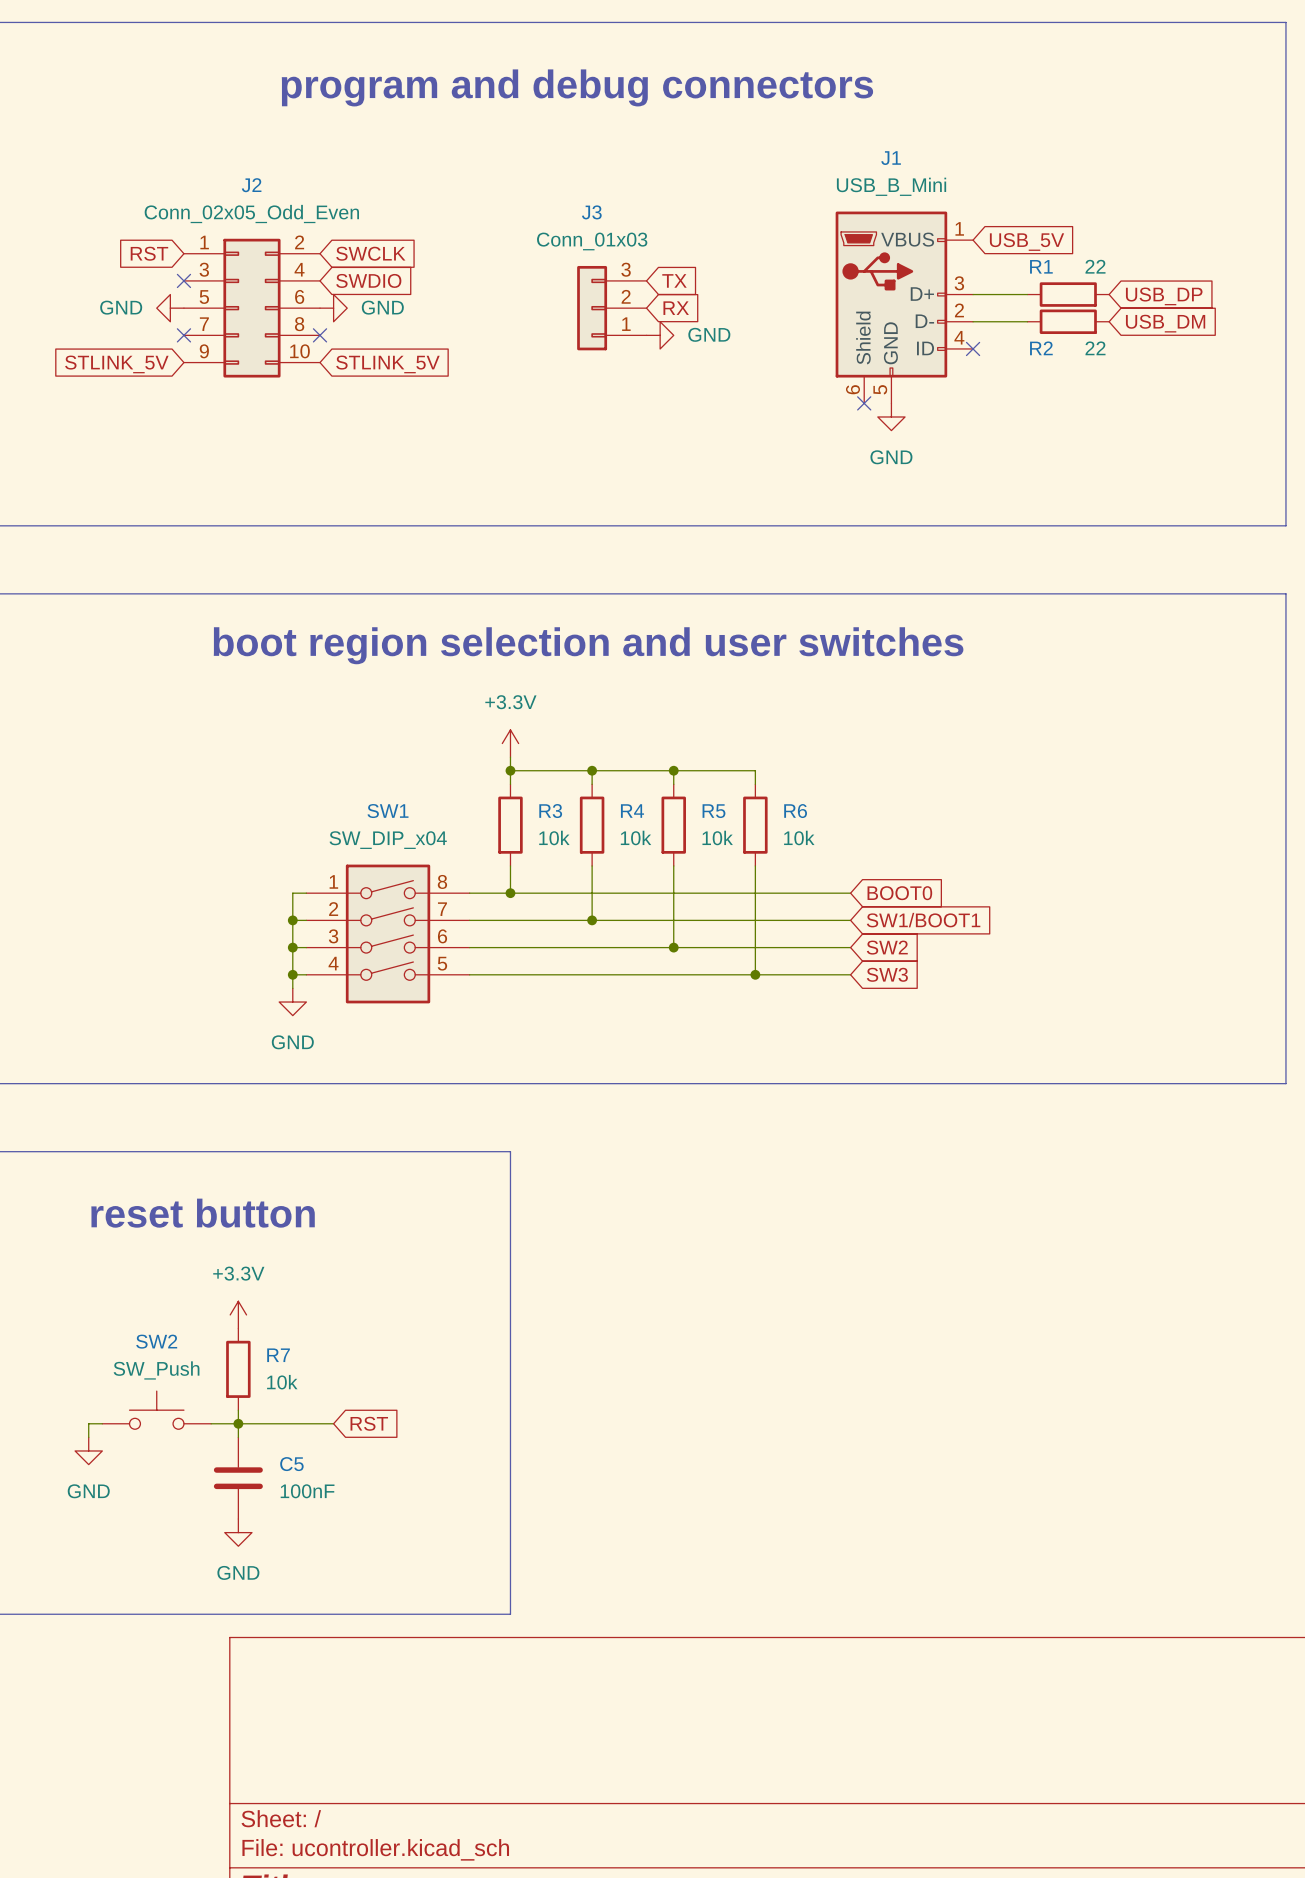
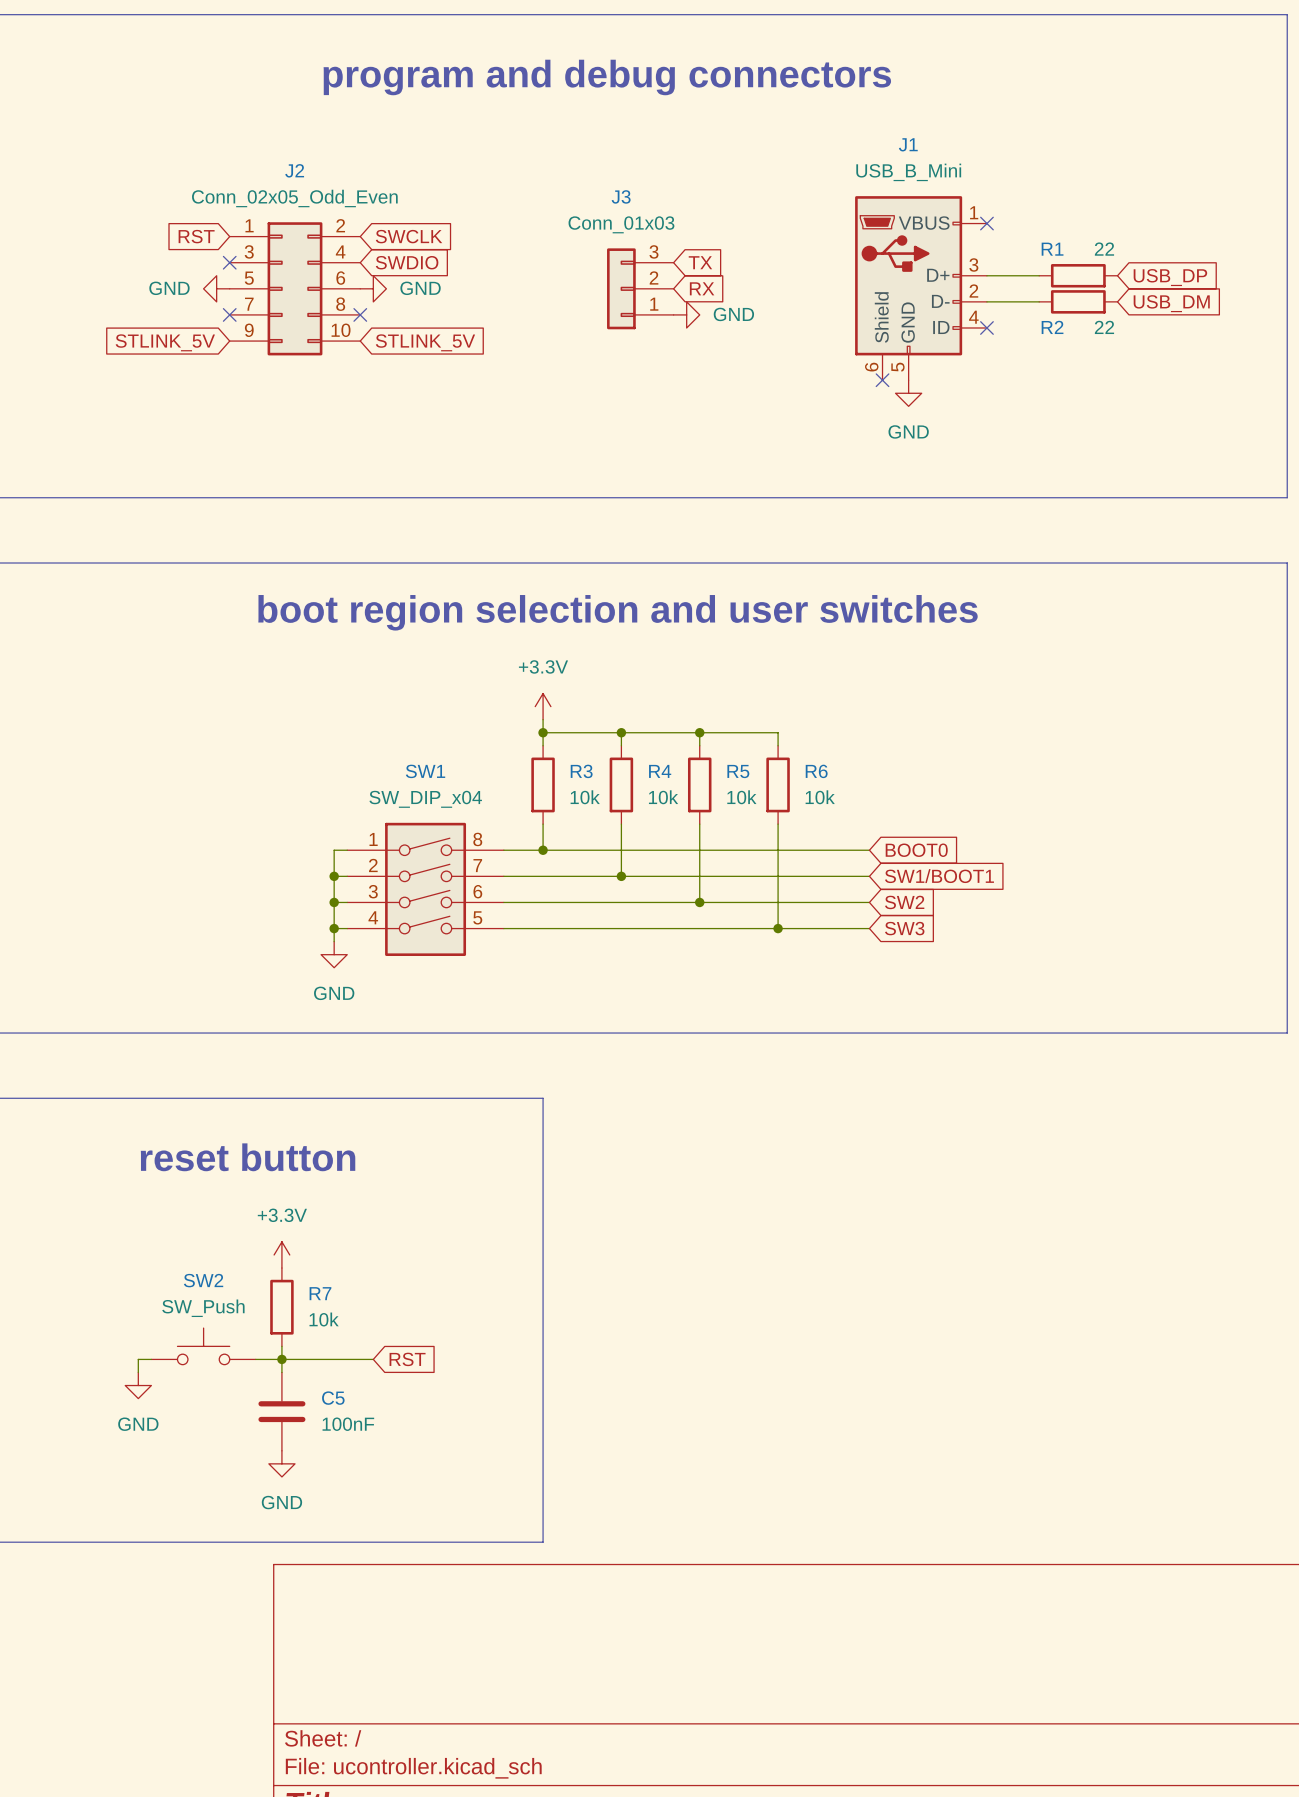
no-connect mark: none -> (986, 223)
global label: USB_5V (1027, 241) -> none

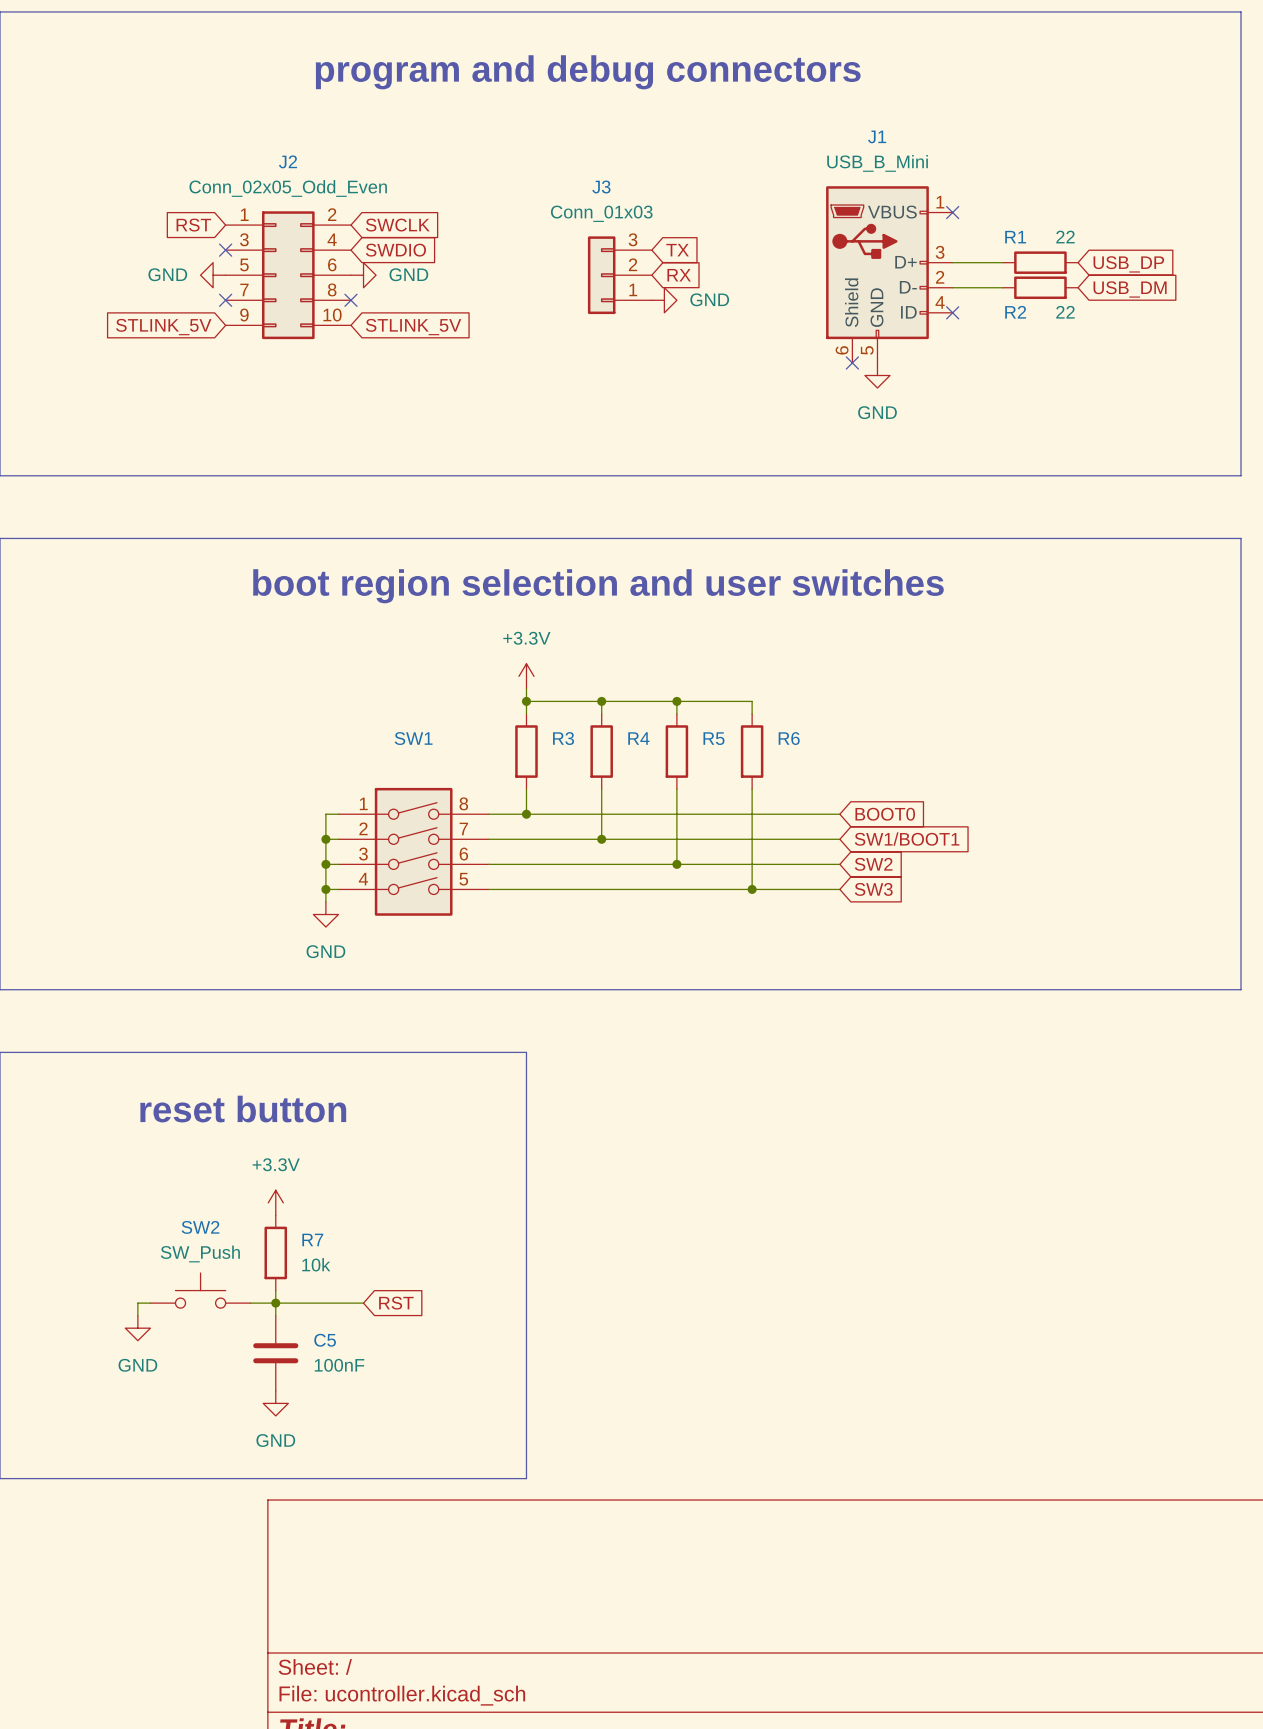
R3 value: 10k (585, 797) -> none
R4 value: 10k (663, 797) -> none
R5 value: 10k (741, 797) -> none
R6 value: 10k (820, 797) -> none
SW1 value: SW_DIP_x04 (425, 799) -> none

